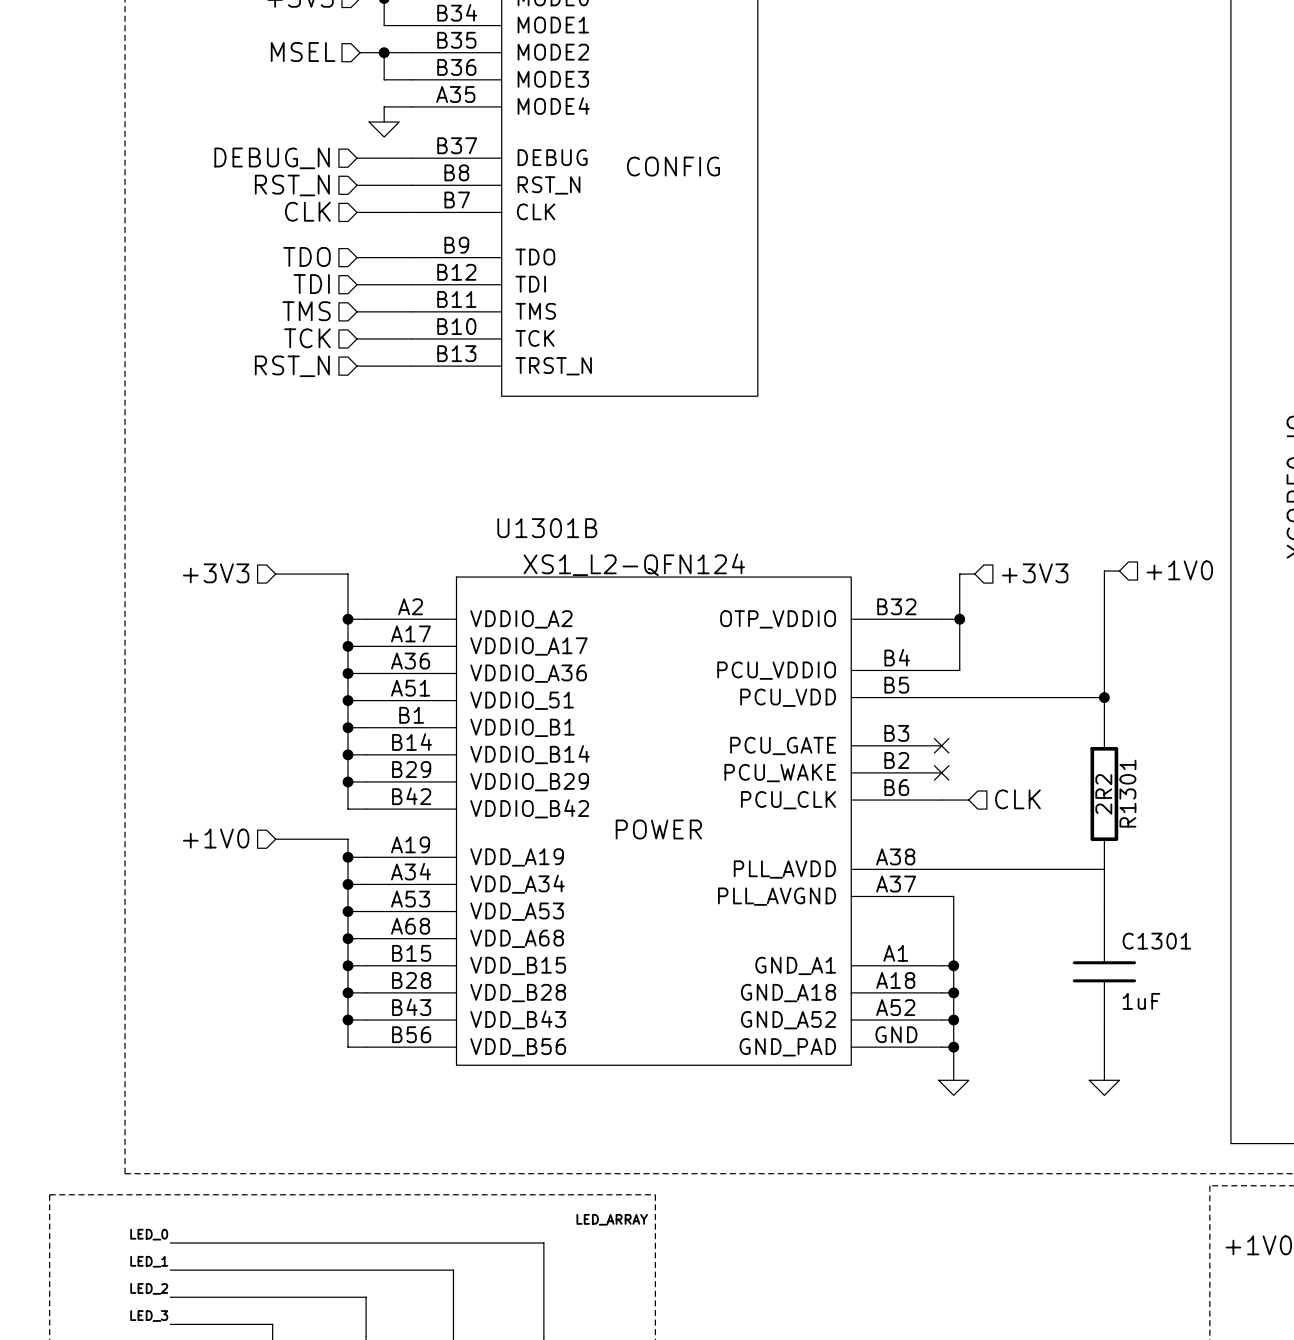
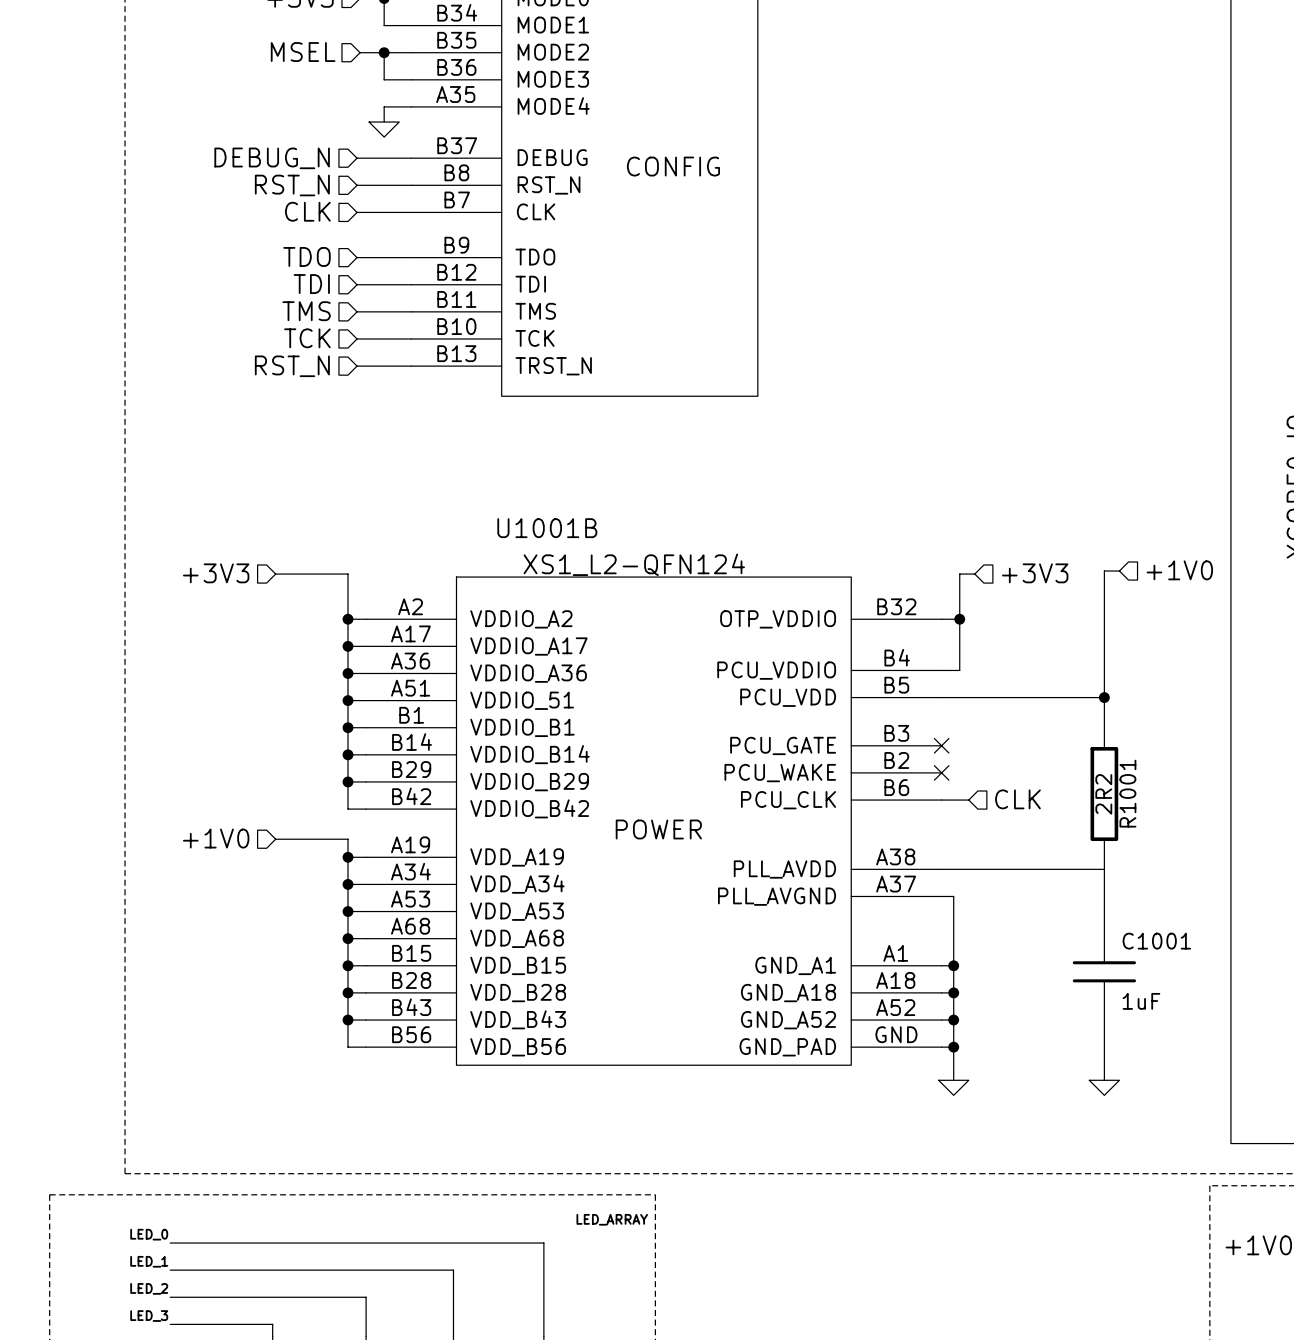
U1301B name: U1301B (547, 528) -> U1001B (547, 528)
R1301 name: R1301 (1127, 793) -> R1001 (1127, 793)
C1301 name: C1301 (1156, 941) -> C1001 (1156, 941)

